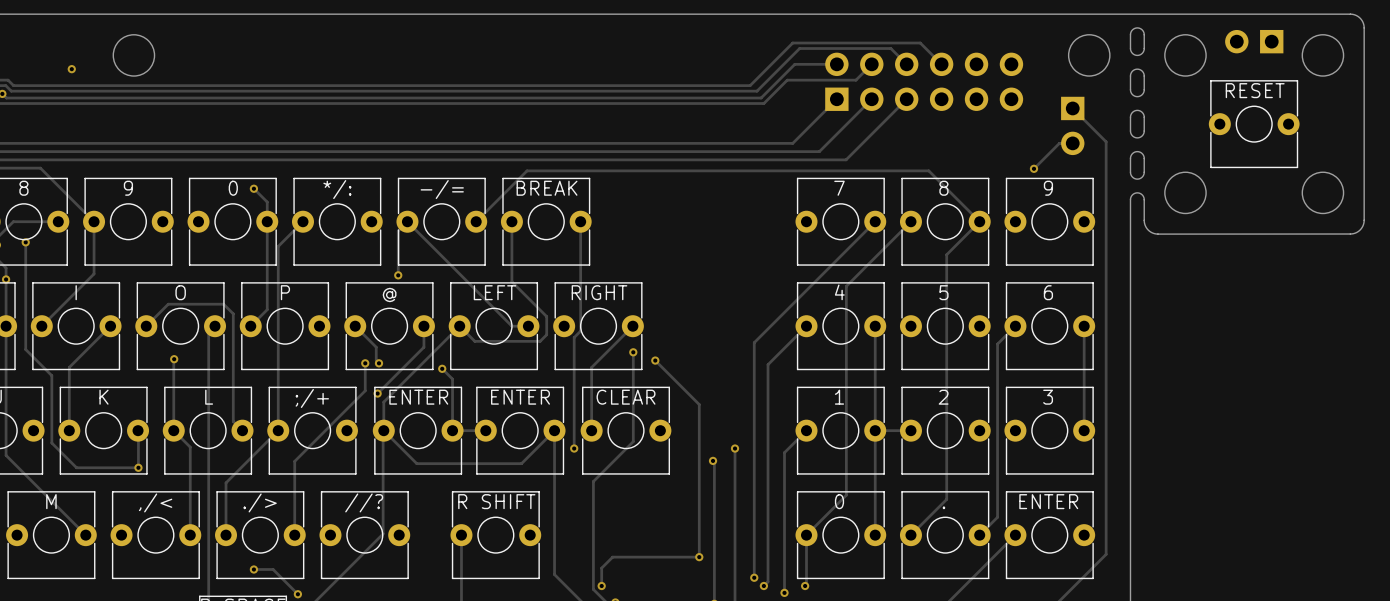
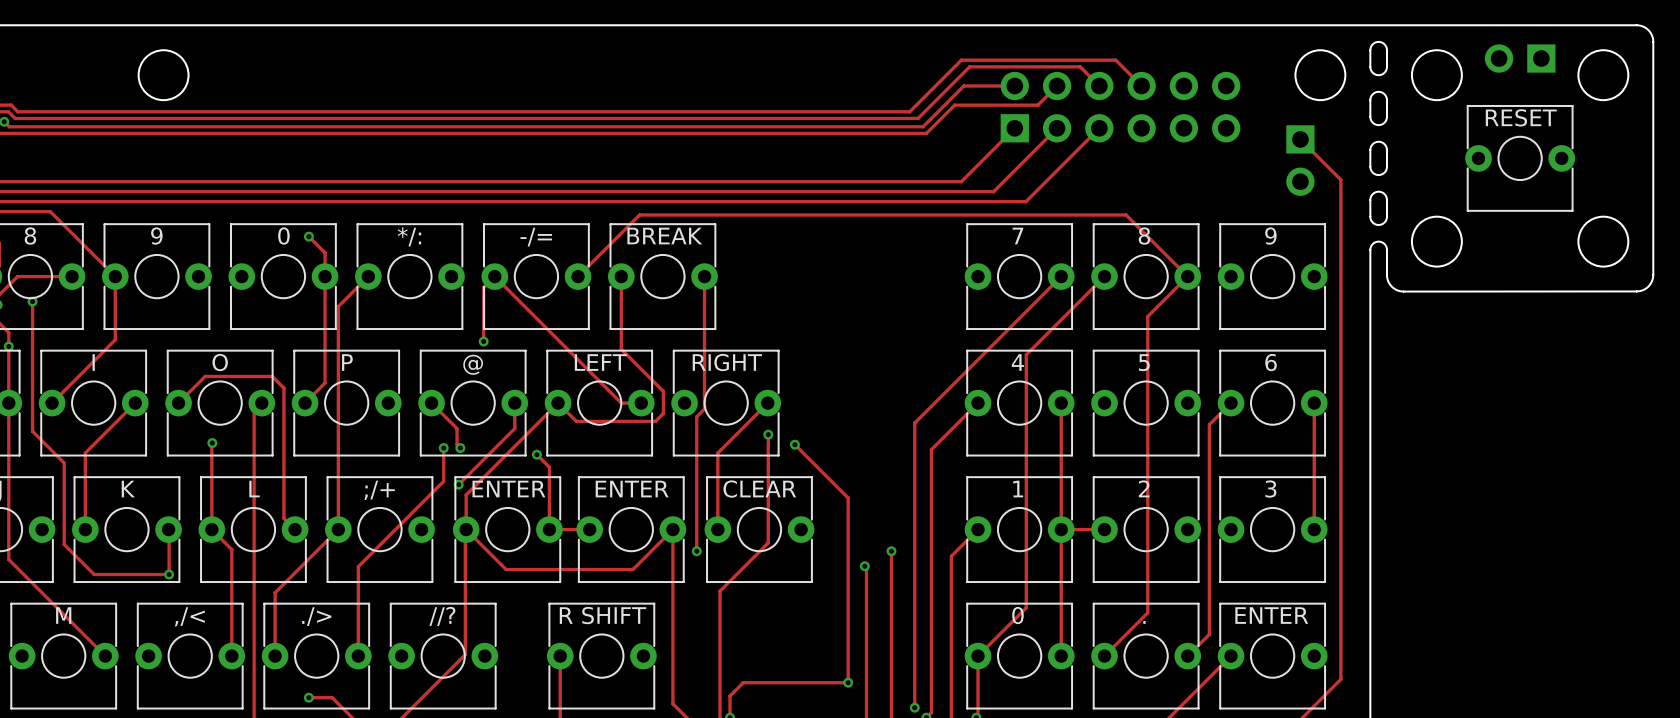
via: (71, 69) -> none
track: (1072, 143) (1059, 143) (1033, 168) -> none
via: (1033, 168) -> none

